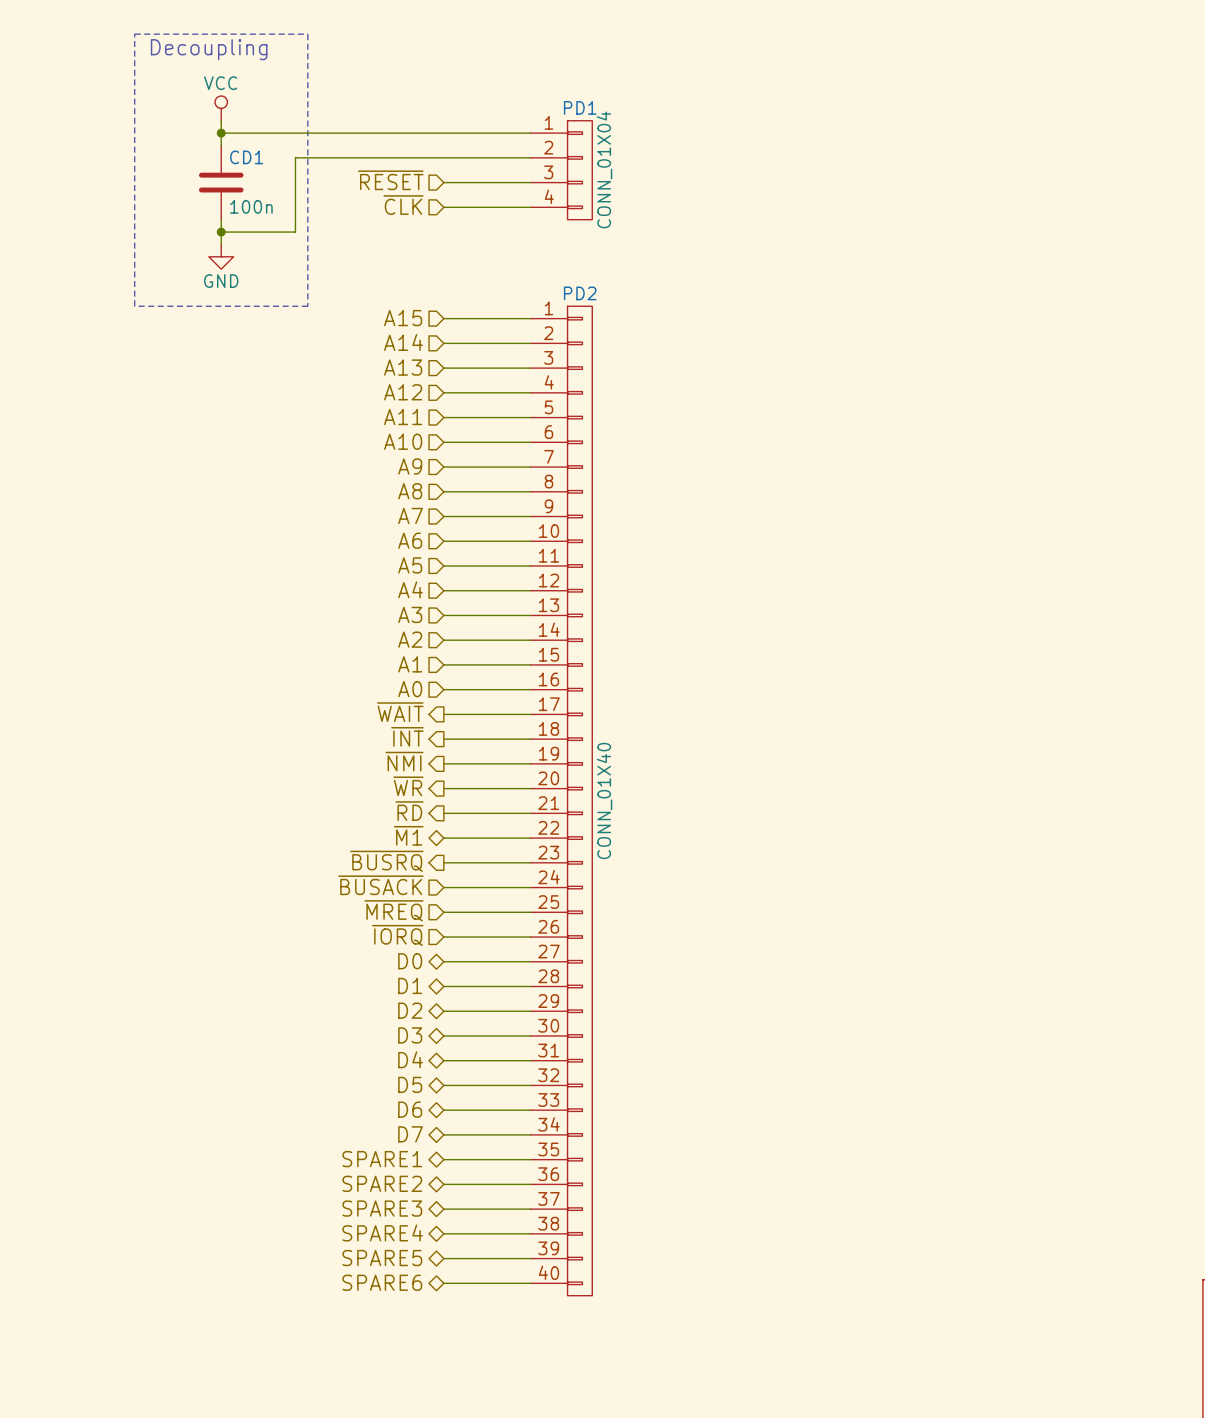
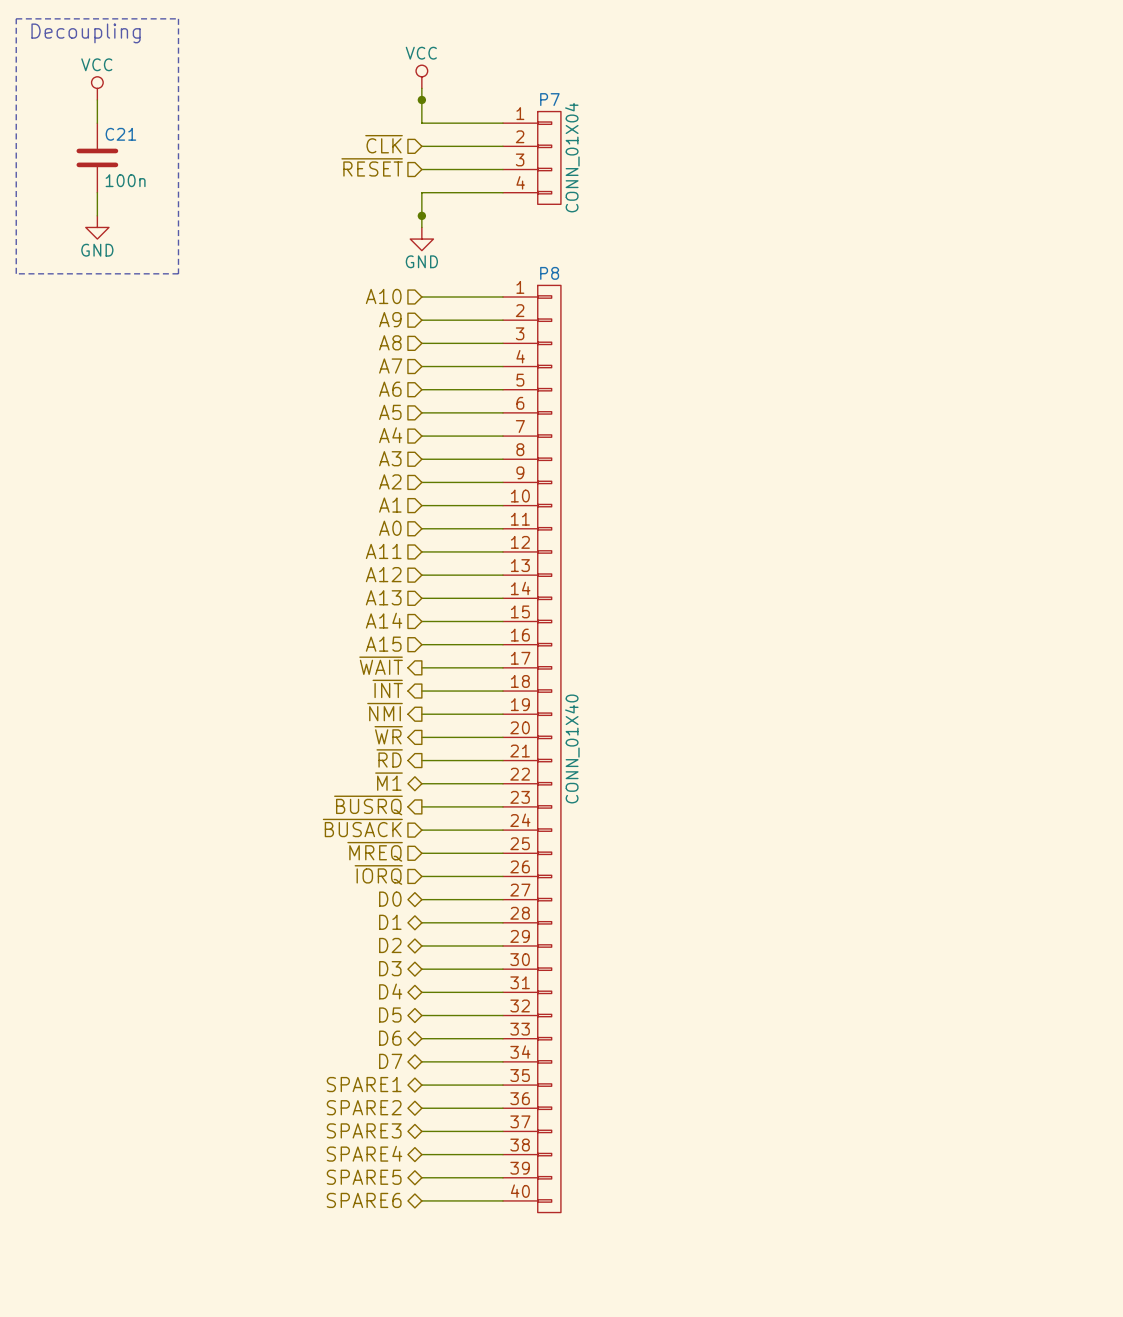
line: (134, 34) (307, 34) (307, 306) (134, 306) (134, 34) -> (16, 18) (178, 18) (178, 273) (16, 273) (16, 18)
text position: Decoupling (209, 49) -> Decoupling (86, 33)
power symbol: none -> VCC (421, 76)
power symbol: none -> VCC (97, 88)
PD1 name: PD1 (580, 107) -> P7 (549, 99)
power symbol: VCC (221, 108) -> none
junction: none -> (421, 99)
wire: (221, 120) (221, 145) -> (97, 99) (97, 123)
wire: (221, 133) (443, 133) -> (421, 88) (421, 123)
junction: (221, 133) -> none
wire: (443, 157) (295, 157) (295, 232) (221, 232) -> none
C21: none -> 100n (97, 157)
CD1: 100n (221, 182) -> none
hierarchical label position: ~{CLK} (403, 205) -> ~{CLK} (384, 144)
wire: none -> (421, 192) (421, 227)
wire: (221, 219) (221, 244) -> (97, 192) (97, 215)
junction: (221, 232) -> none
junction: none -> (421, 215)
power symbol: none -> GND (97, 227)
power symbol: GND (221, 256) -> none
power symbol: none -> GND (421, 239)
PD2 name: PD2 (580, 293) -> P8 (549, 273)
hierarchical label: A15 (403, 318) -> A10 (383, 296)
hierarchical label: A14 (403, 342) -> A9 (390, 319)
hierarchical label: A13 (403, 367) -> A8 (390, 342)
hierarchical label: A12 (403, 392) -> A7 (390, 366)
hierarchical label: A11 (403, 417) -> A6 (390, 389)
hierarchical label: A10 (403, 441) -> A5 (390, 412)
hierarchical label: A9 (410, 466) -> A4 (390, 435)
hierarchical label: A8 (410, 491) -> A3 (390, 458)
hierarchical label: A7 (410, 515) -> A2 (390, 481)
hierarchical label: A6 (410, 540) -> A1 (390, 505)
hierarchical label: A5 (410, 565) -> A0 (390, 528)
hierarchical label: A4 (410, 589) -> A11 (383, 551)
hierarchical label: A3 (410, 614) -> A12 (383, 574)
hierarchical label: A2 (410, 639) -> A13 (383, 597)
hierarchical label: A1 (410, 664) -> A14 (384, 620)
hierarchical label: A0 (410, 689) -> A15 (383, 644)

